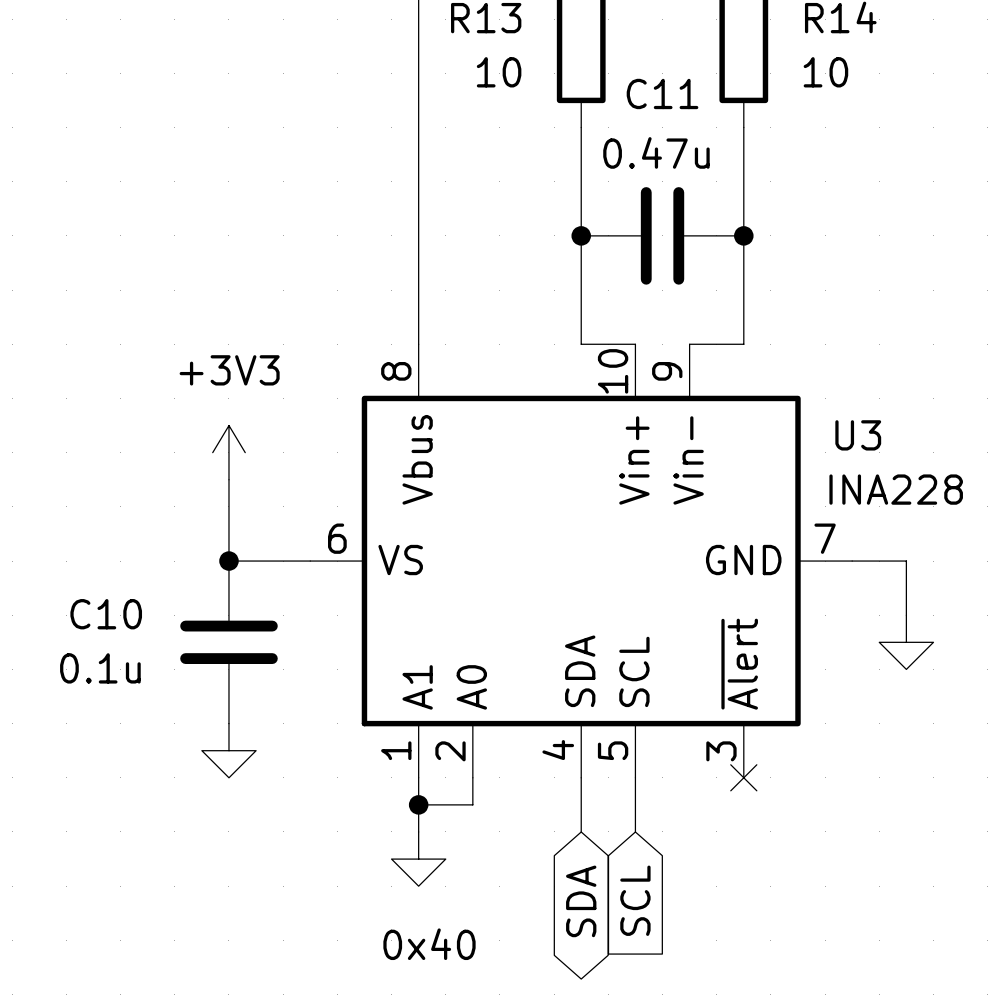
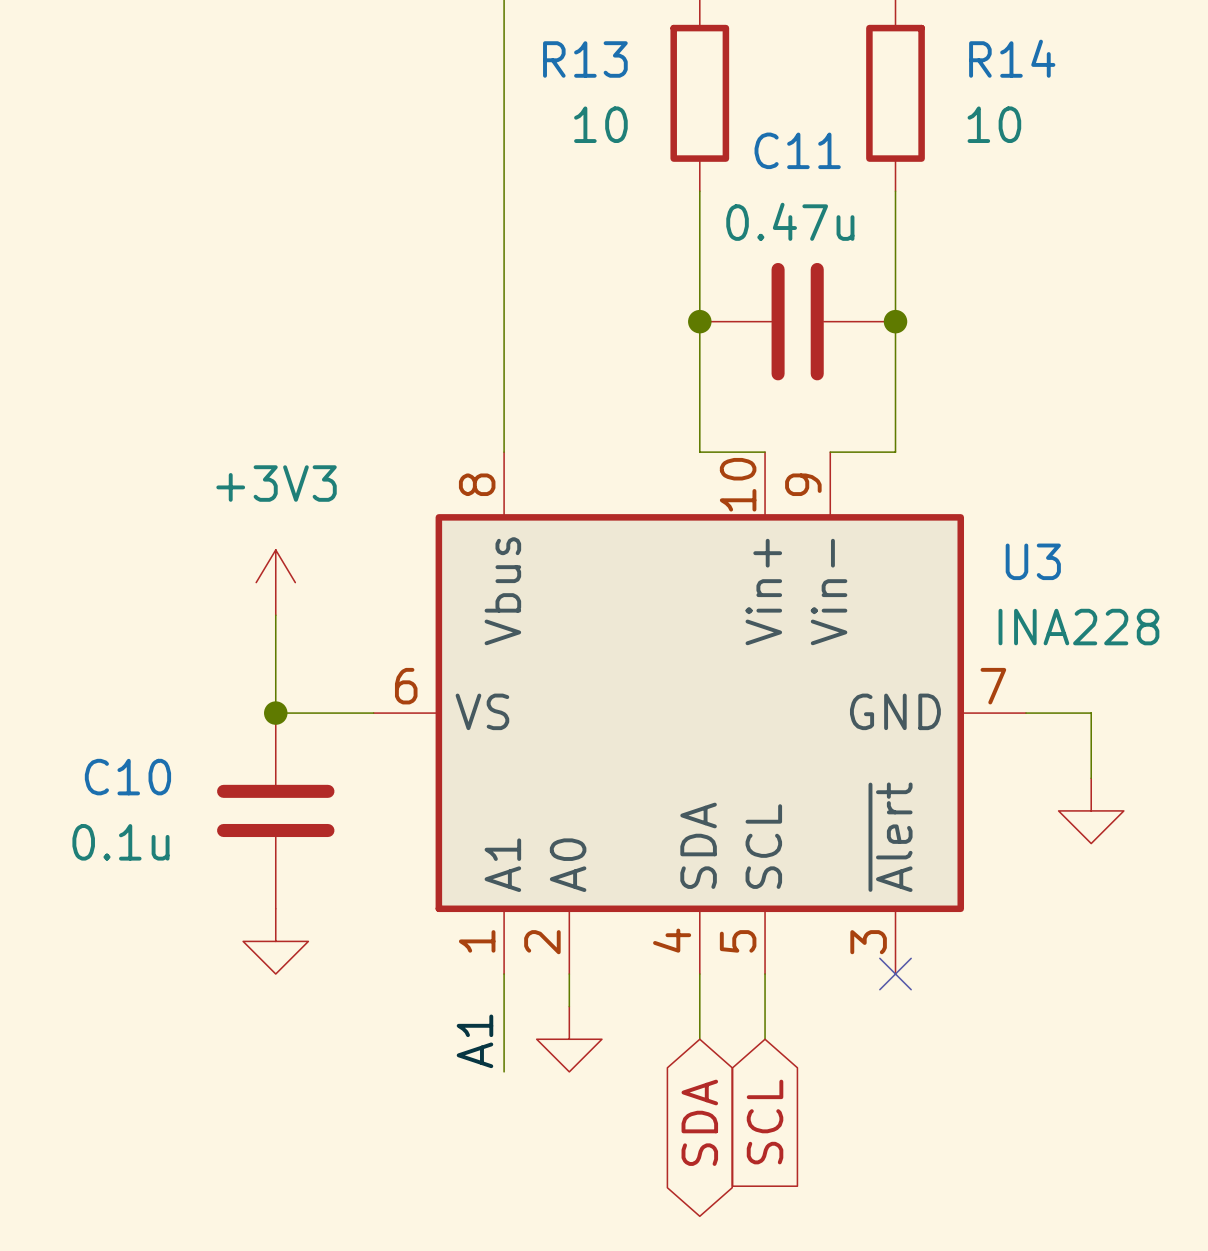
wire: (418, 804) (472, 804) -> none
junction: (418, 804) -> none
label: none -> A1 (474, 1041)
power symbol position: (418, 859) -> (569, 1039)
text: 0x40 (429, 944) -> none

